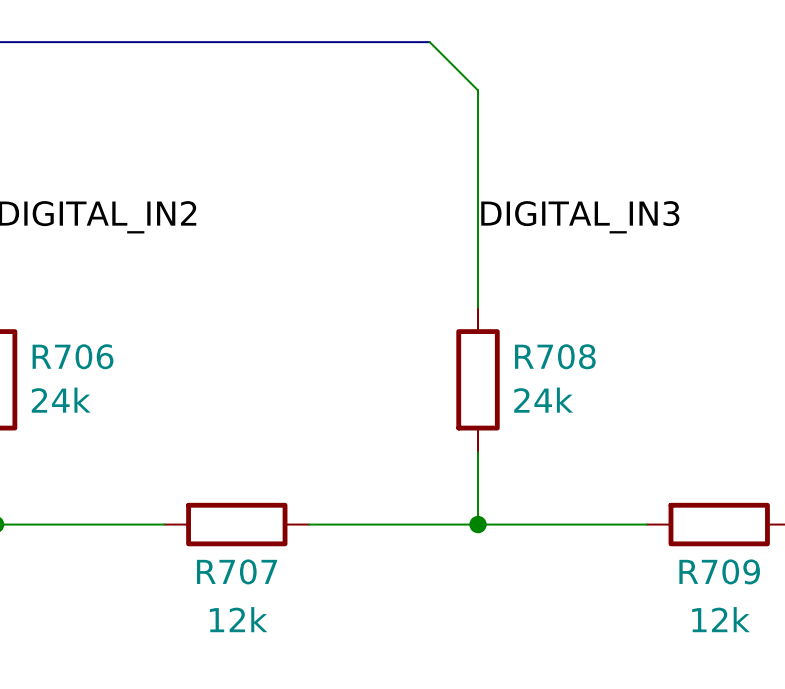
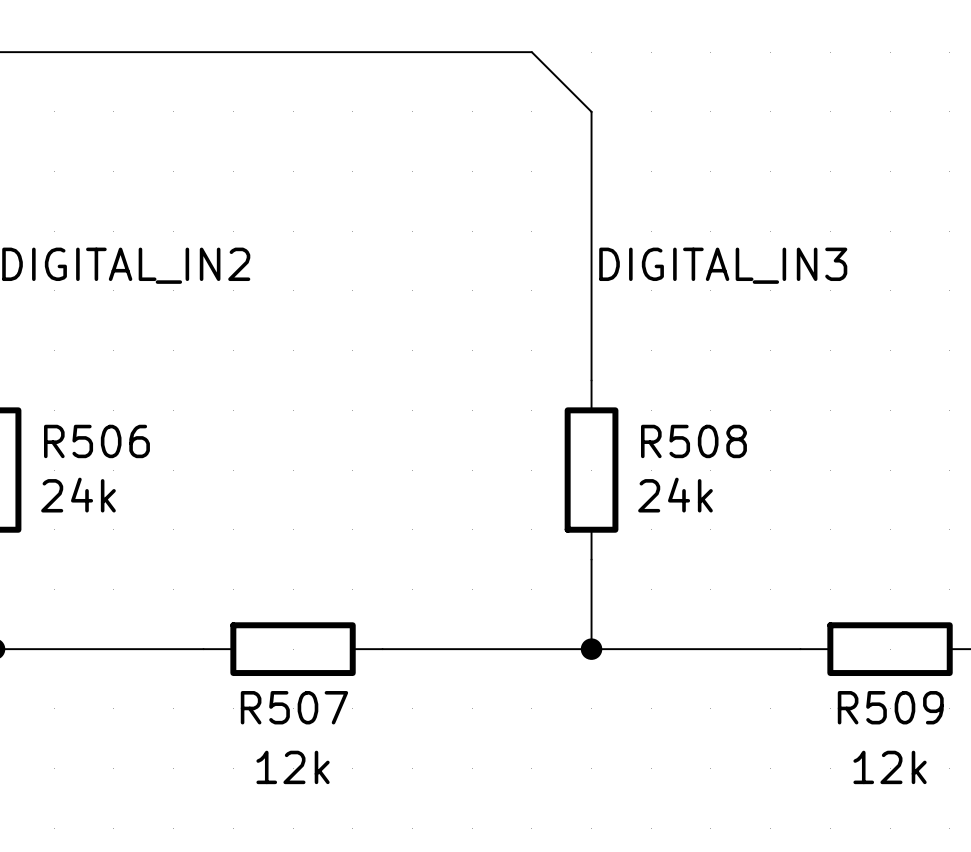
R706 name: R706 (73, 356) -> R506 (96, 441)
R708 name: R708 (555, 356) -> R508 (693, 441)
R707 name: R707 (237, 571) -> R507 (294, 707)
R709 name: R709 (719, 571) -> R509 (890, 707)

